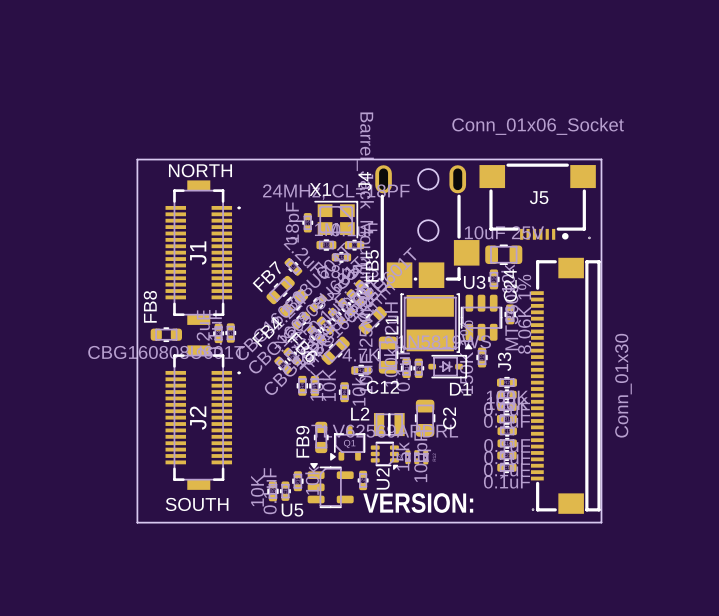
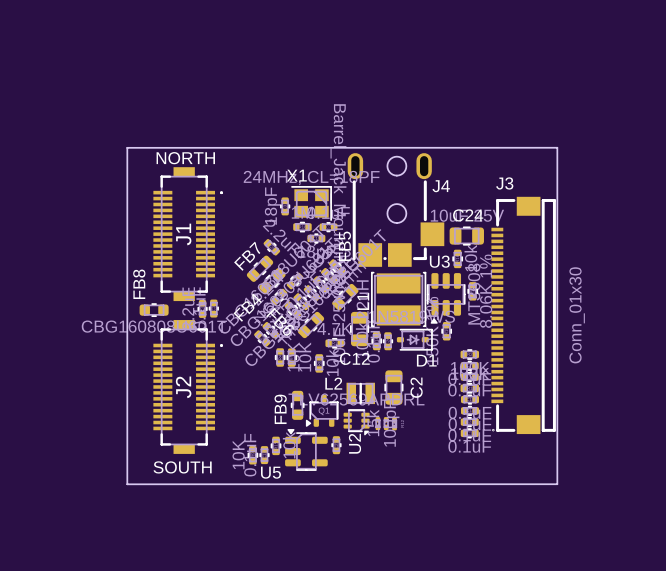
J4 name rotation: 0° (364, 181) -> 90° clockwise (441, 186)
J4 name position: J4 (364, 181) -> J4 (441, 186)
J5: Conn_01x06_Socket (537, 201) -> none
C24 name rotation: 0° (510, 285) -> 90° clockwise (468, 215)
C24 name position: C24 (510, 285) -> C24 (468, 215)
J3 name rotation: 0° (504, 361) -> 90° clockwise (504, 183)
J3 name position: J3 (504, 361) -> J3 (504, 183)
J3 position: (565, 385) -> (523, 315)
text: VERSION: (418, 503) -> none

